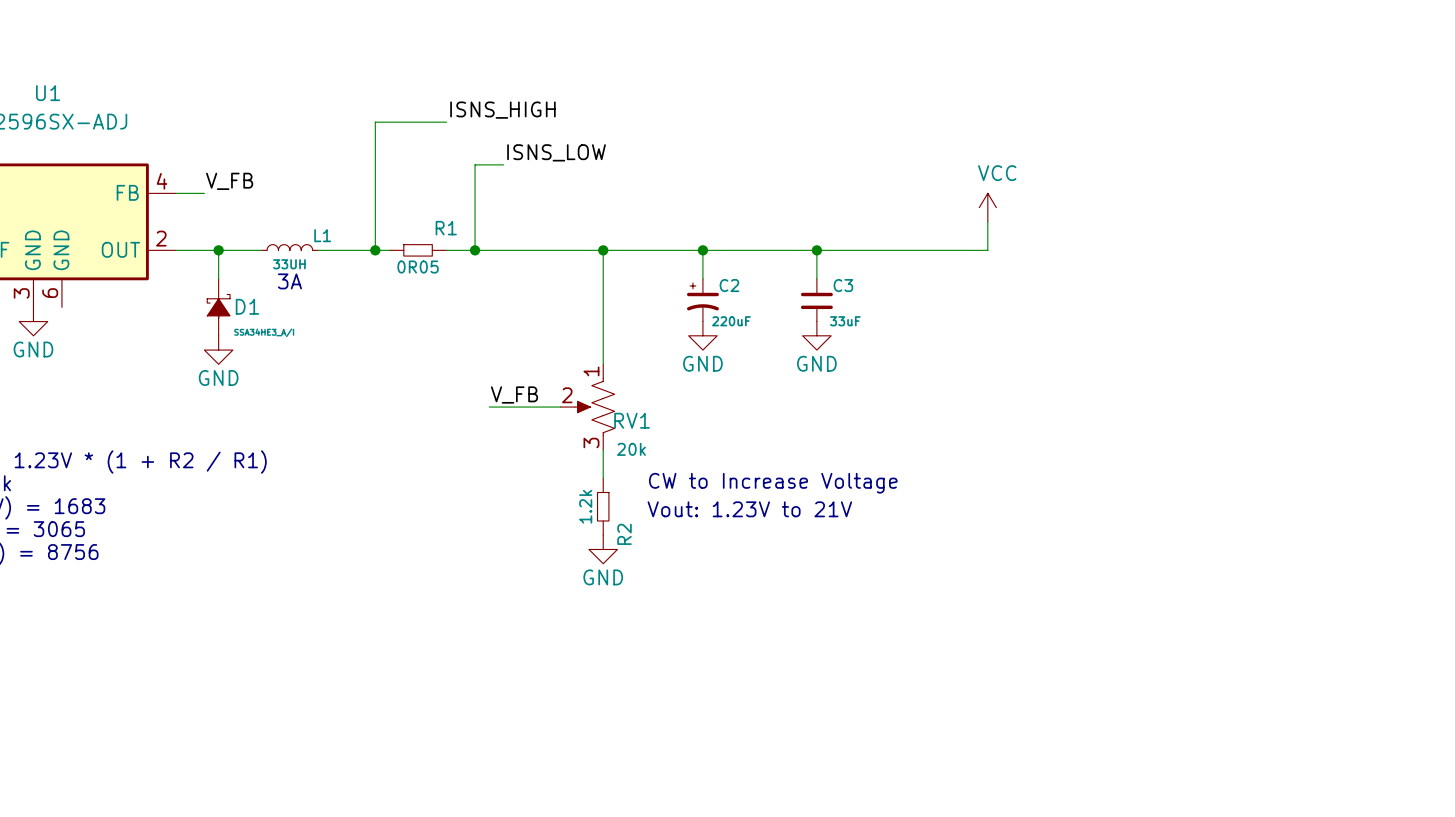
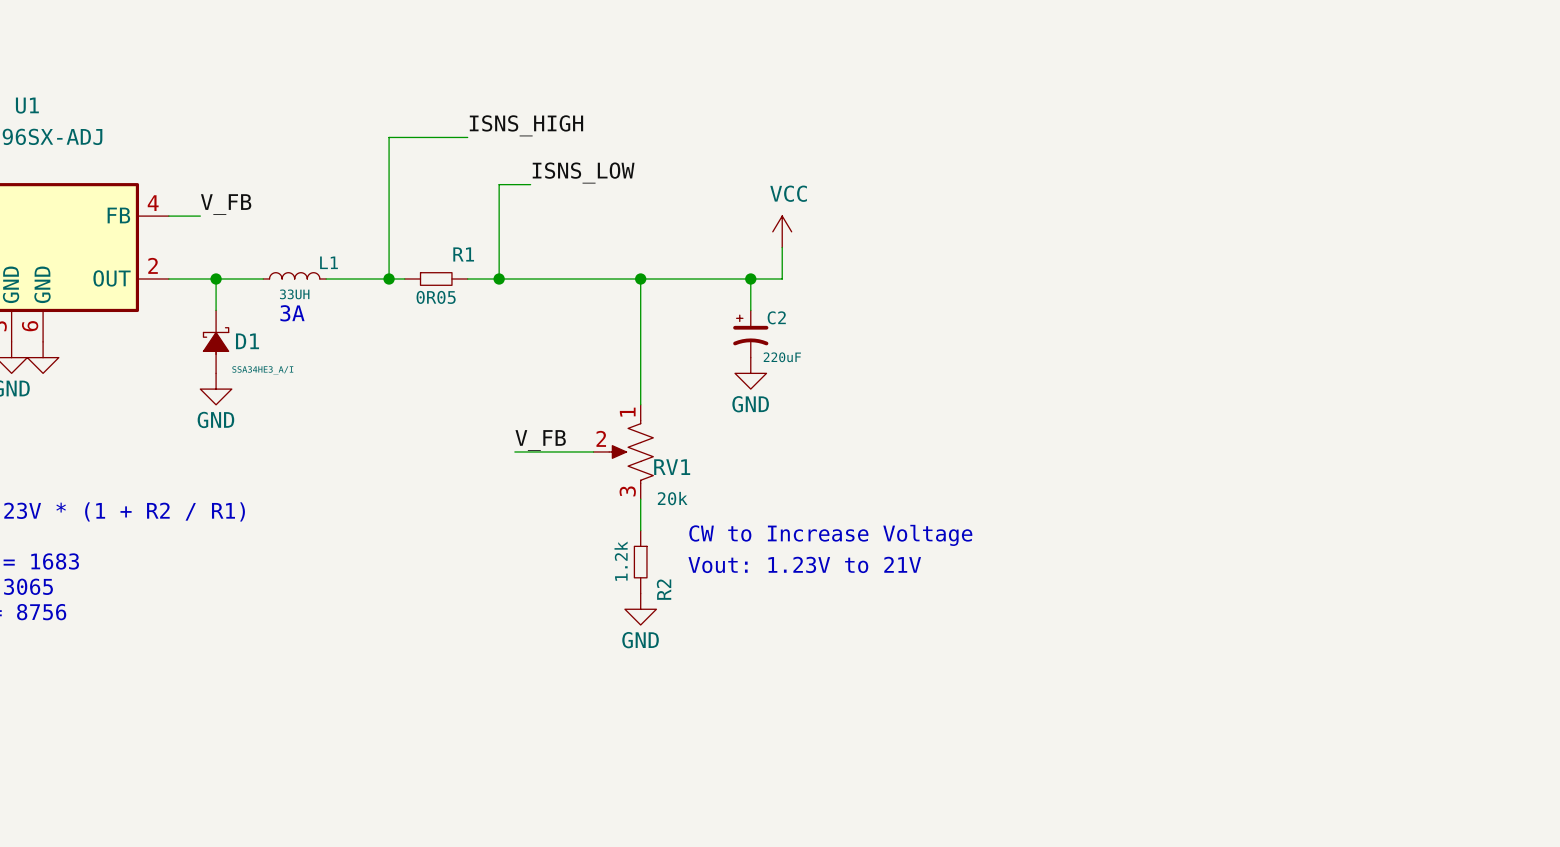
power symbol position: VCC (987, 207) -> VCC (782, 231)
wire: (987, 221) (987, 250) (731, 250) -> (782, 247) (782, 279)
wire: (816, 250) (816, 278) -> none
junction: (816, 250) -> none
C3: (816, 300) -> none
power symbol: none -> (43, 357)
power symbol: GND (816, 335) -> none

